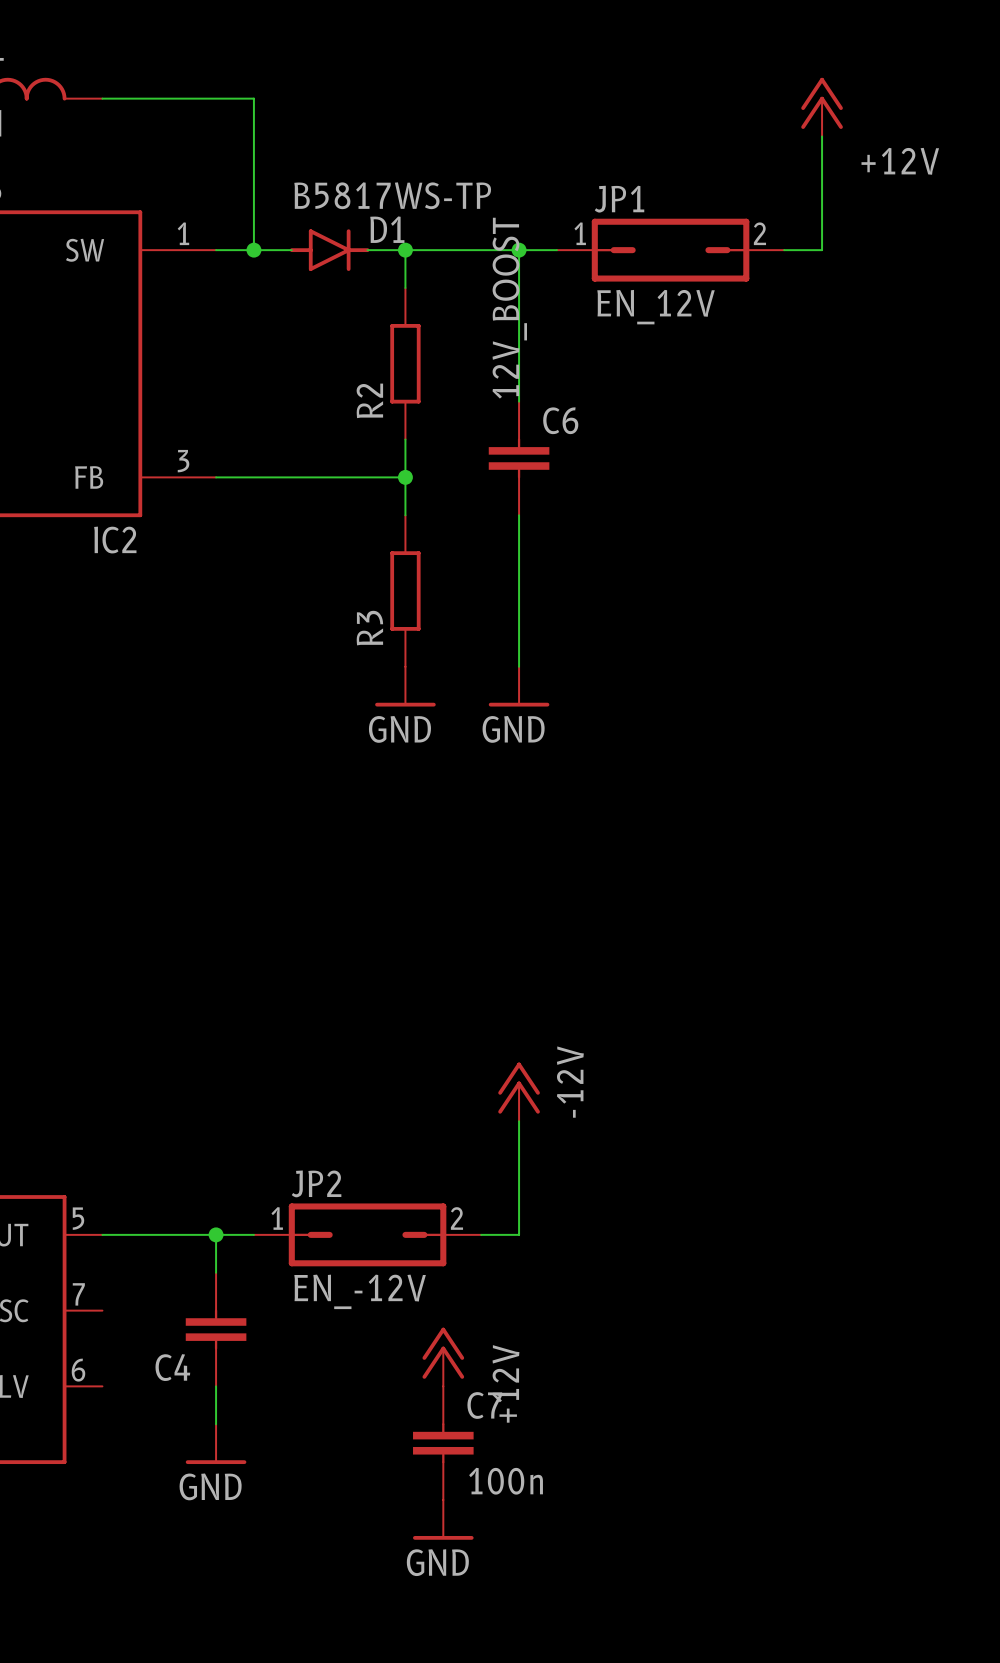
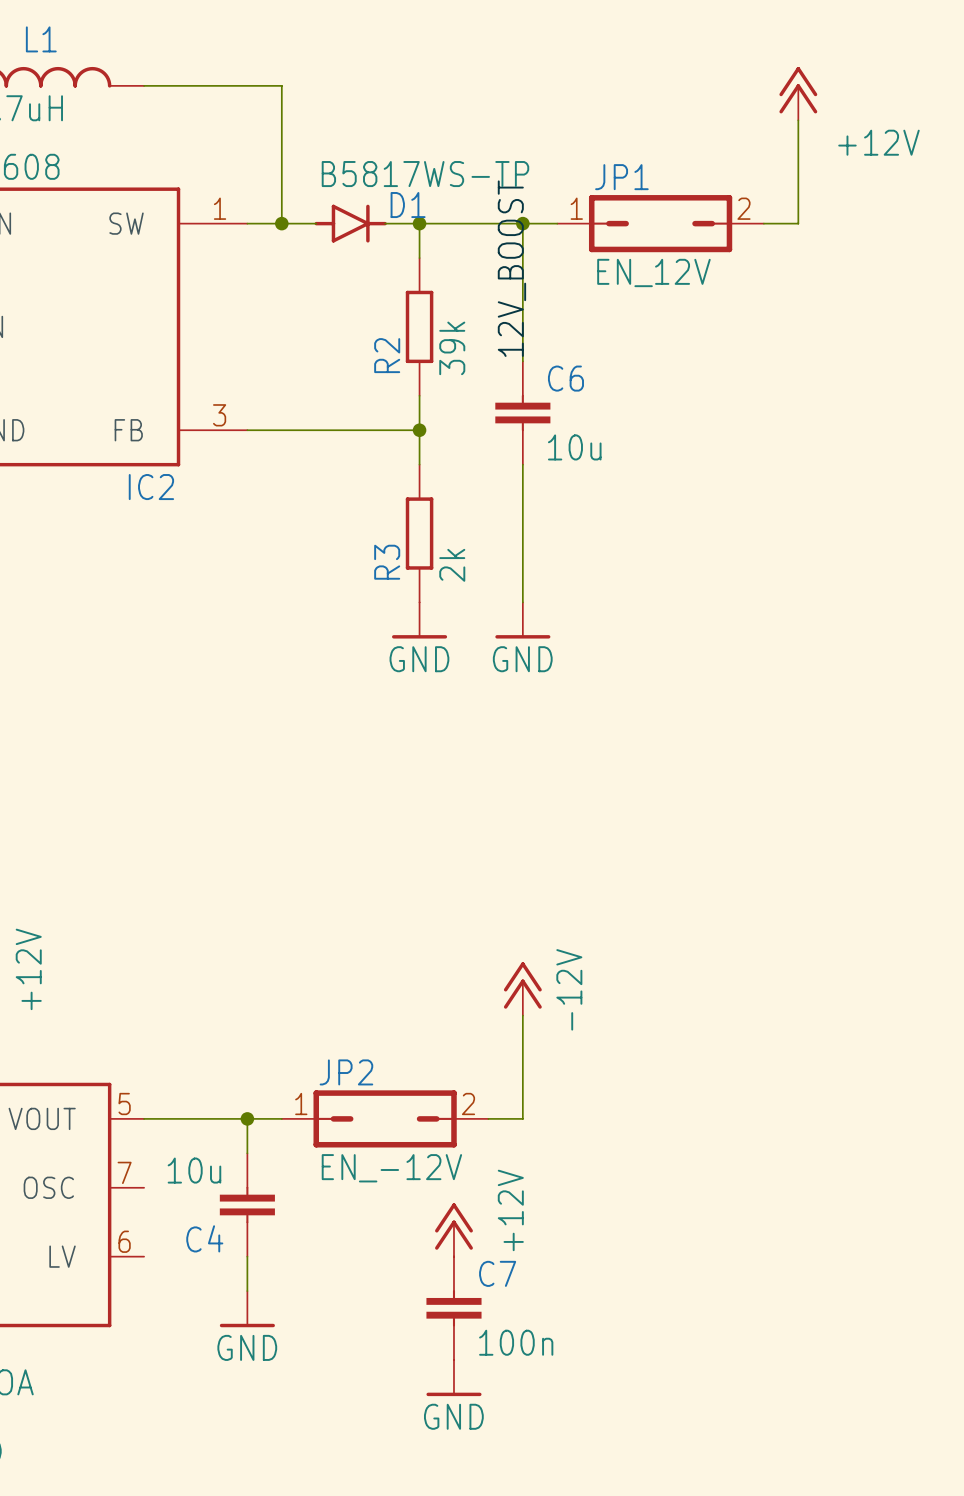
R2 value: none -> 39k (452, 348)
C6 value: none -> 10u (574, 447)
R3 value: none -> 2k (452, 565)
C4 value: none -> 10u (194, 1170)
power symbol text position: +12V (505, 1383) -> +12V (510, 1210)

